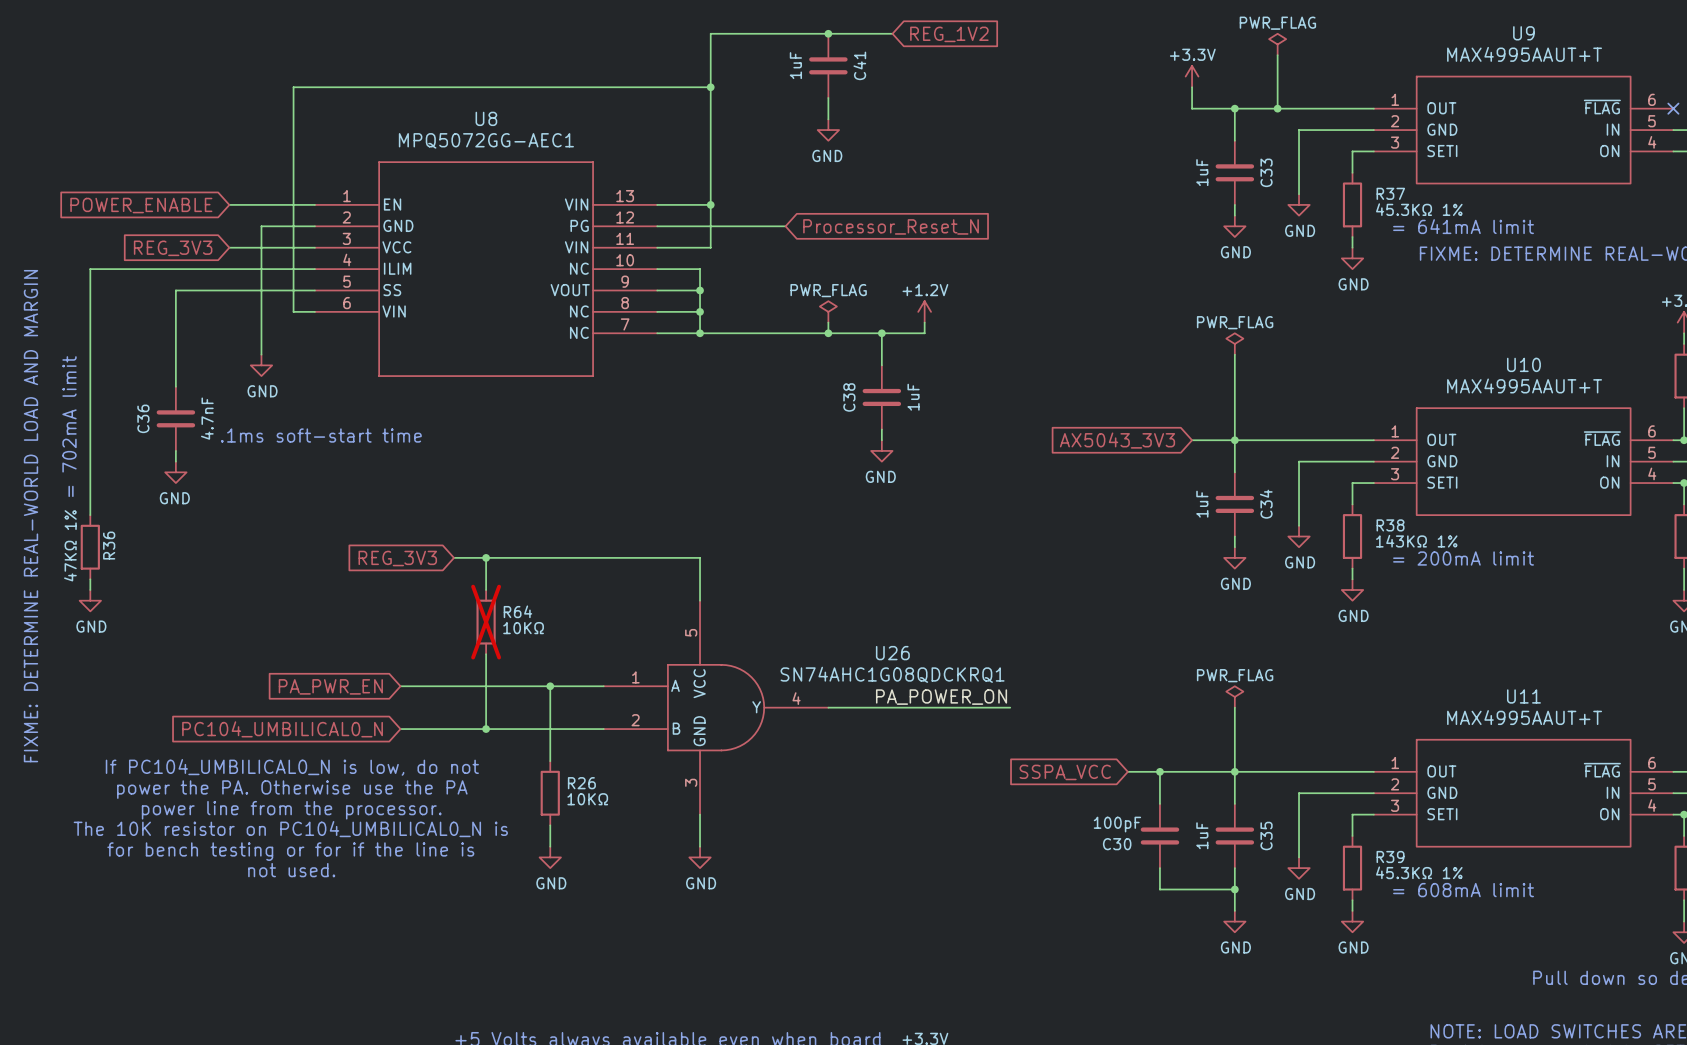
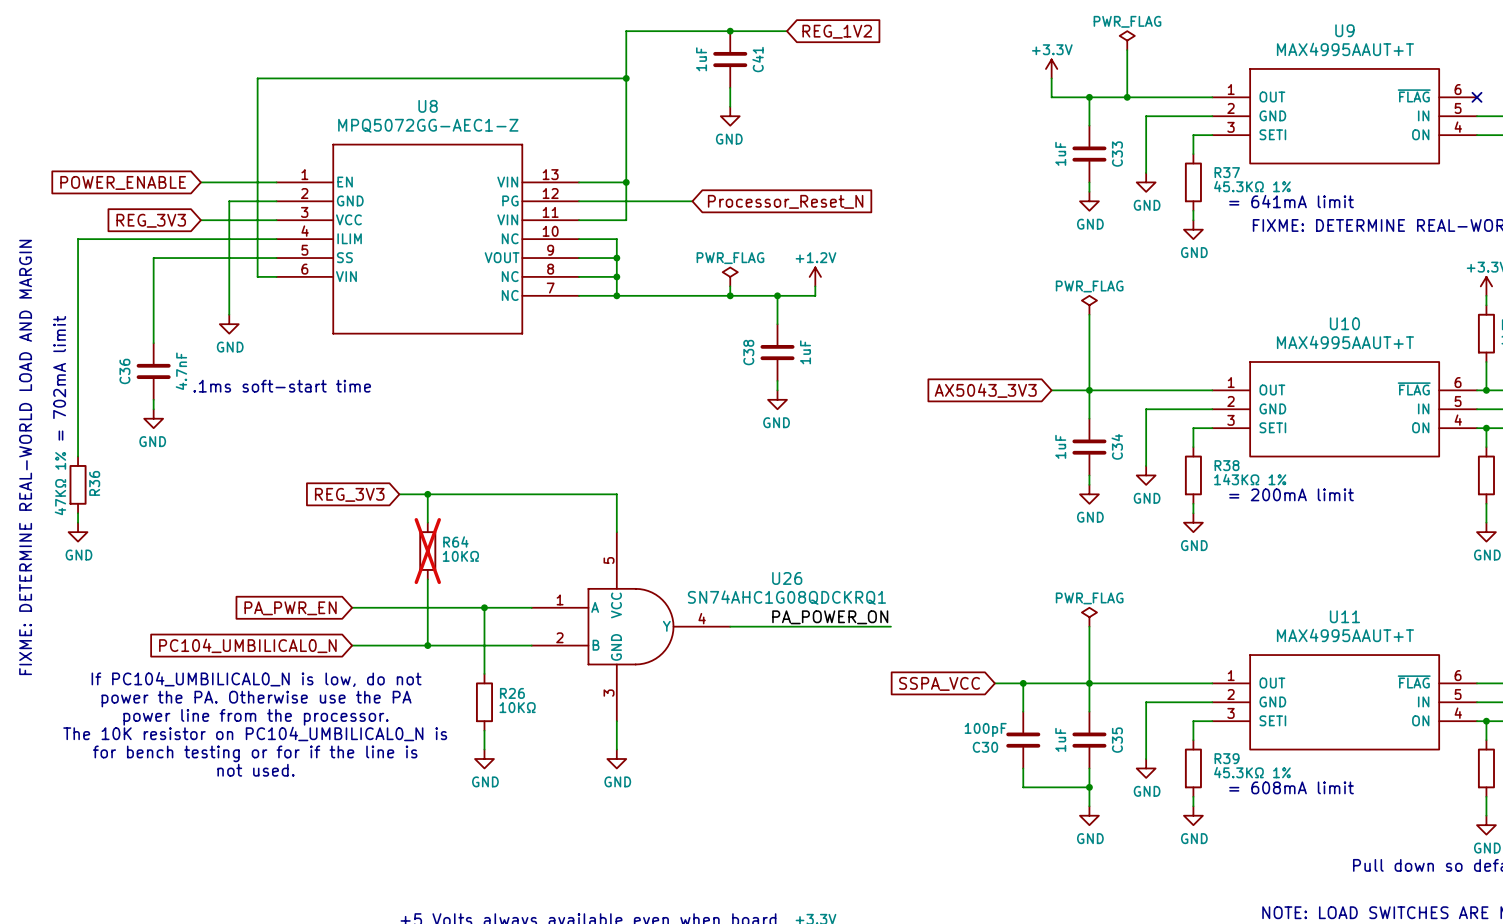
U8 value: MPQ5072GG-AEC1 (486, 140) -> MPQ5072GG-AEC1-Z (428, 125)

